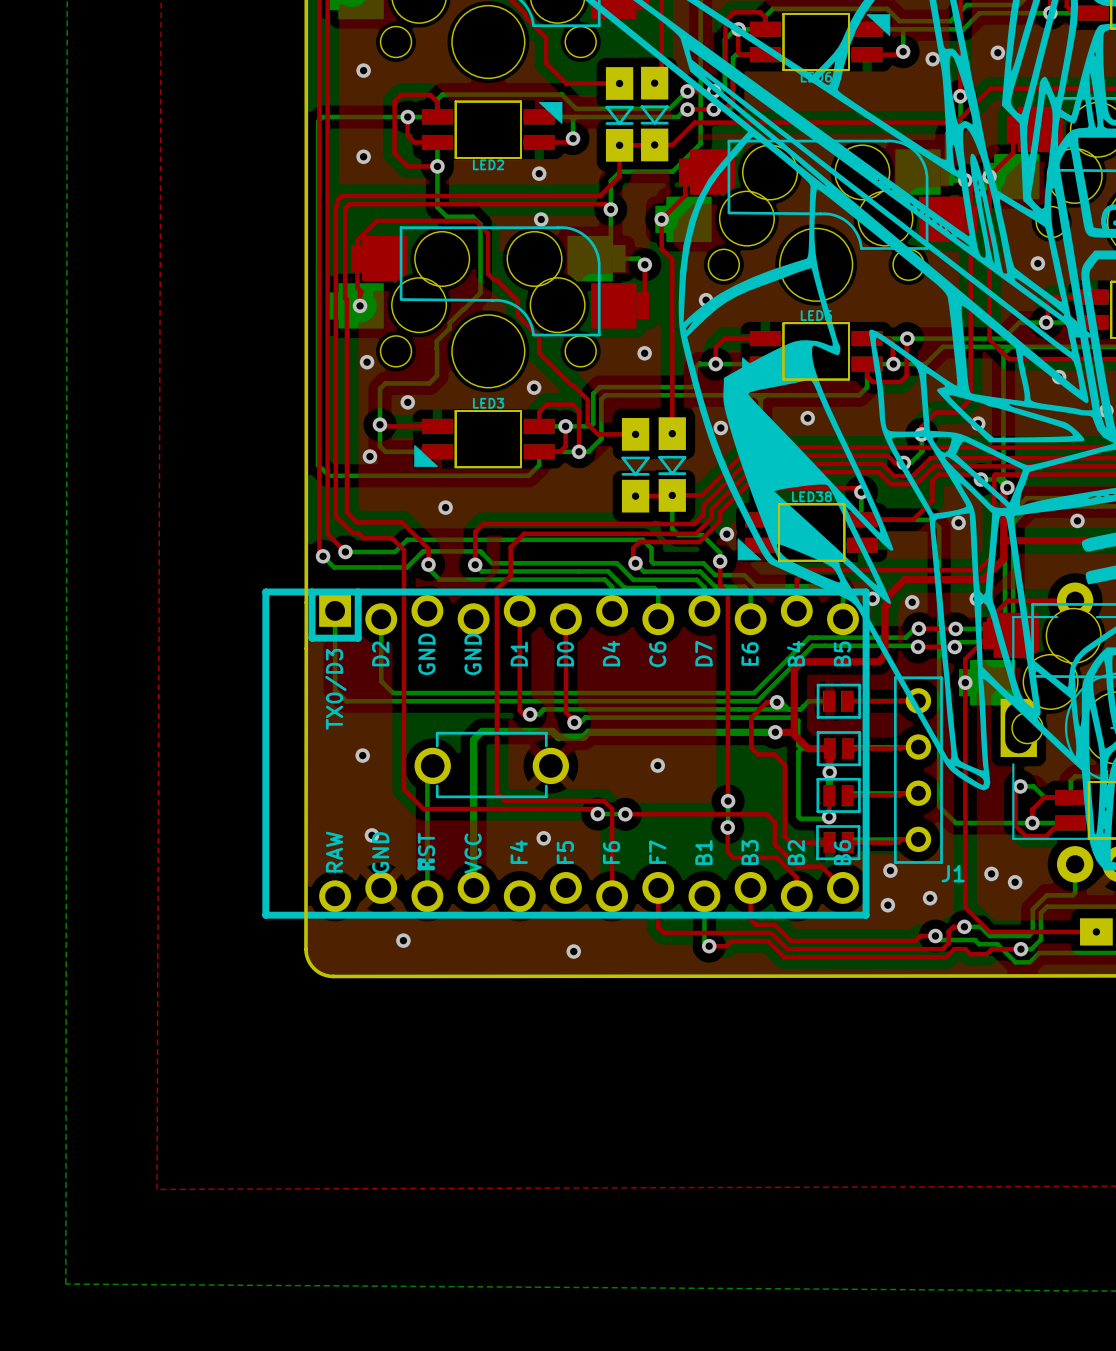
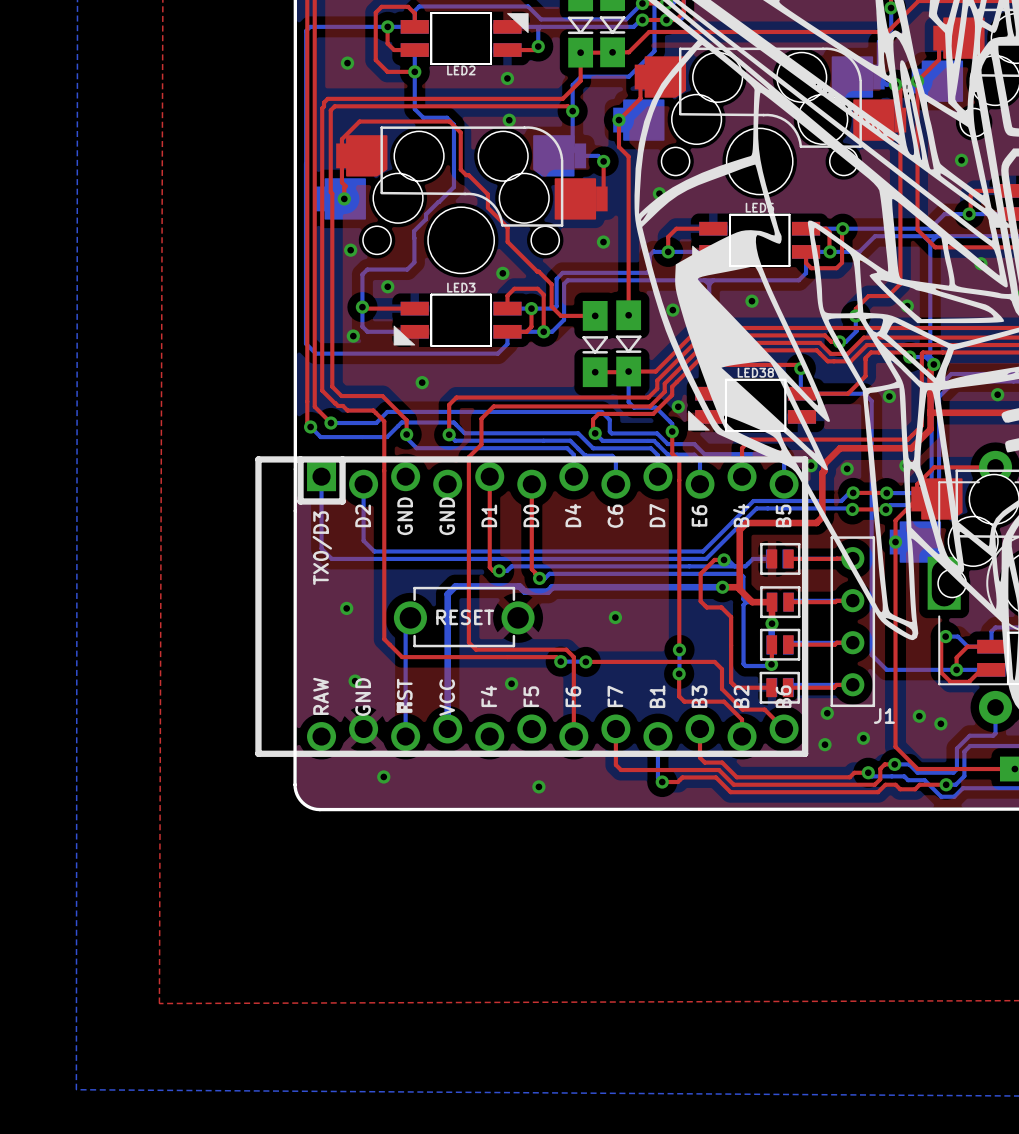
part text: none -> RESET (465, 617)

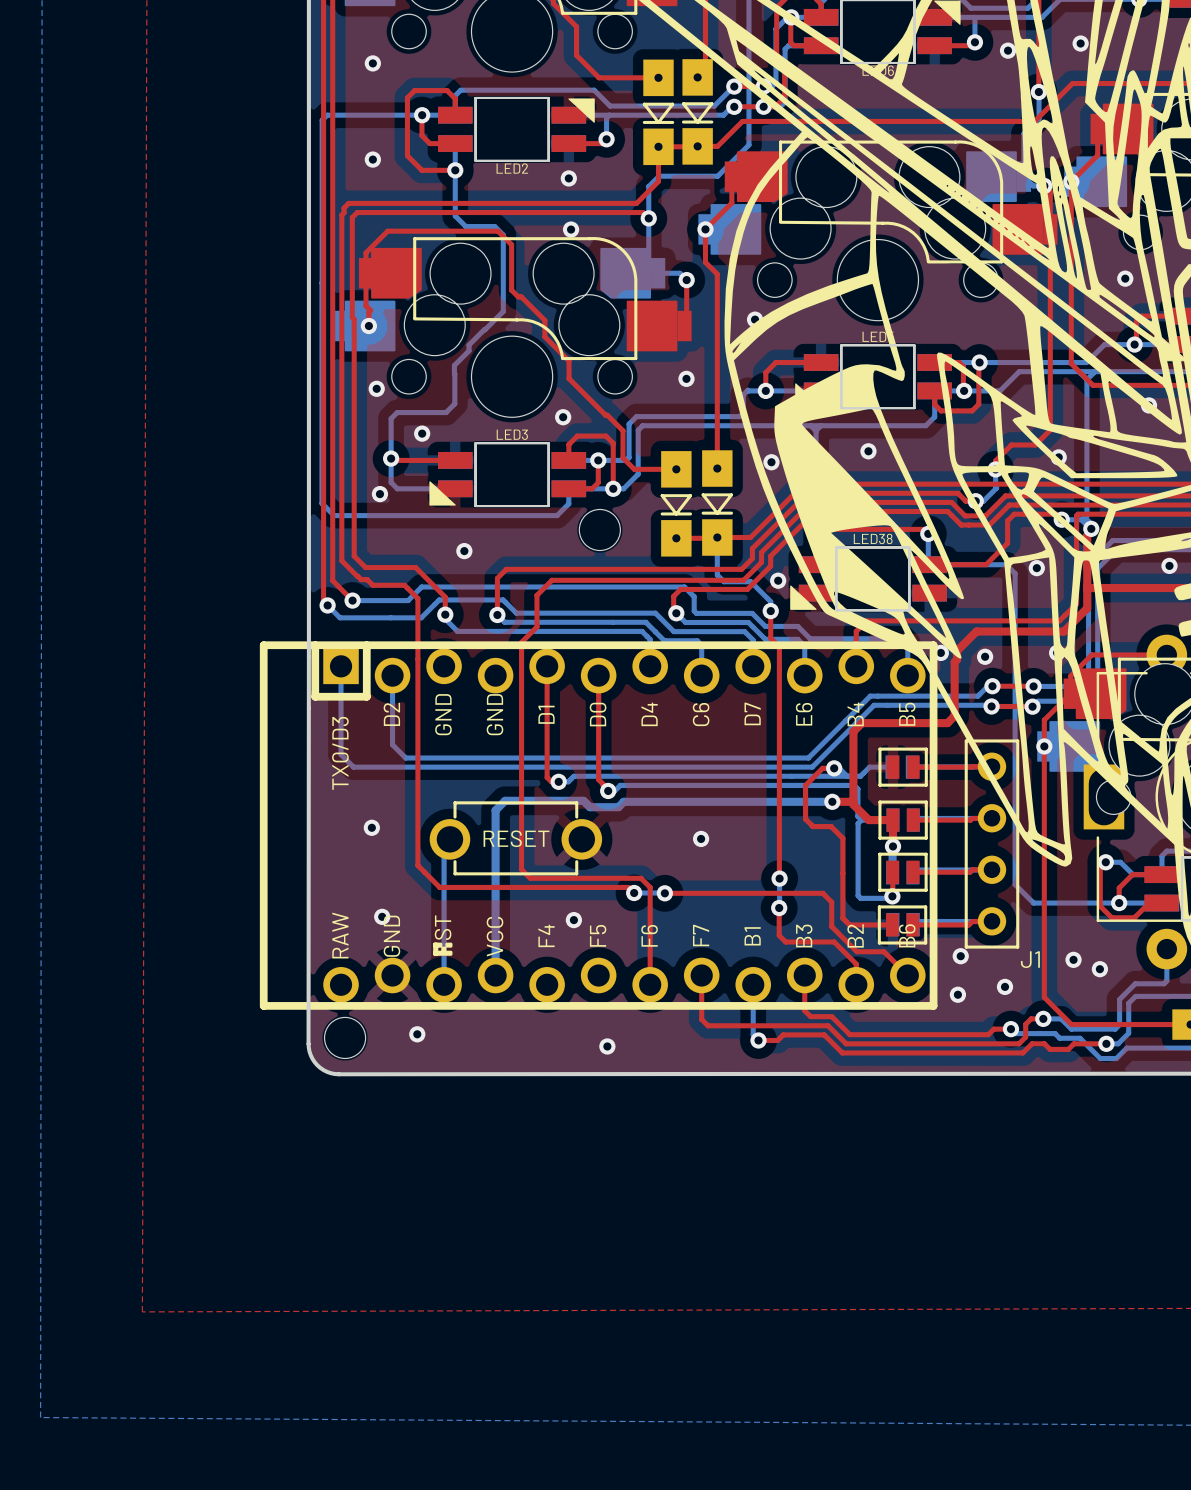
round board edge: none -> [578, 508, 621, 552]
round board edge: none -> [324, 1016, 367, 1059]

